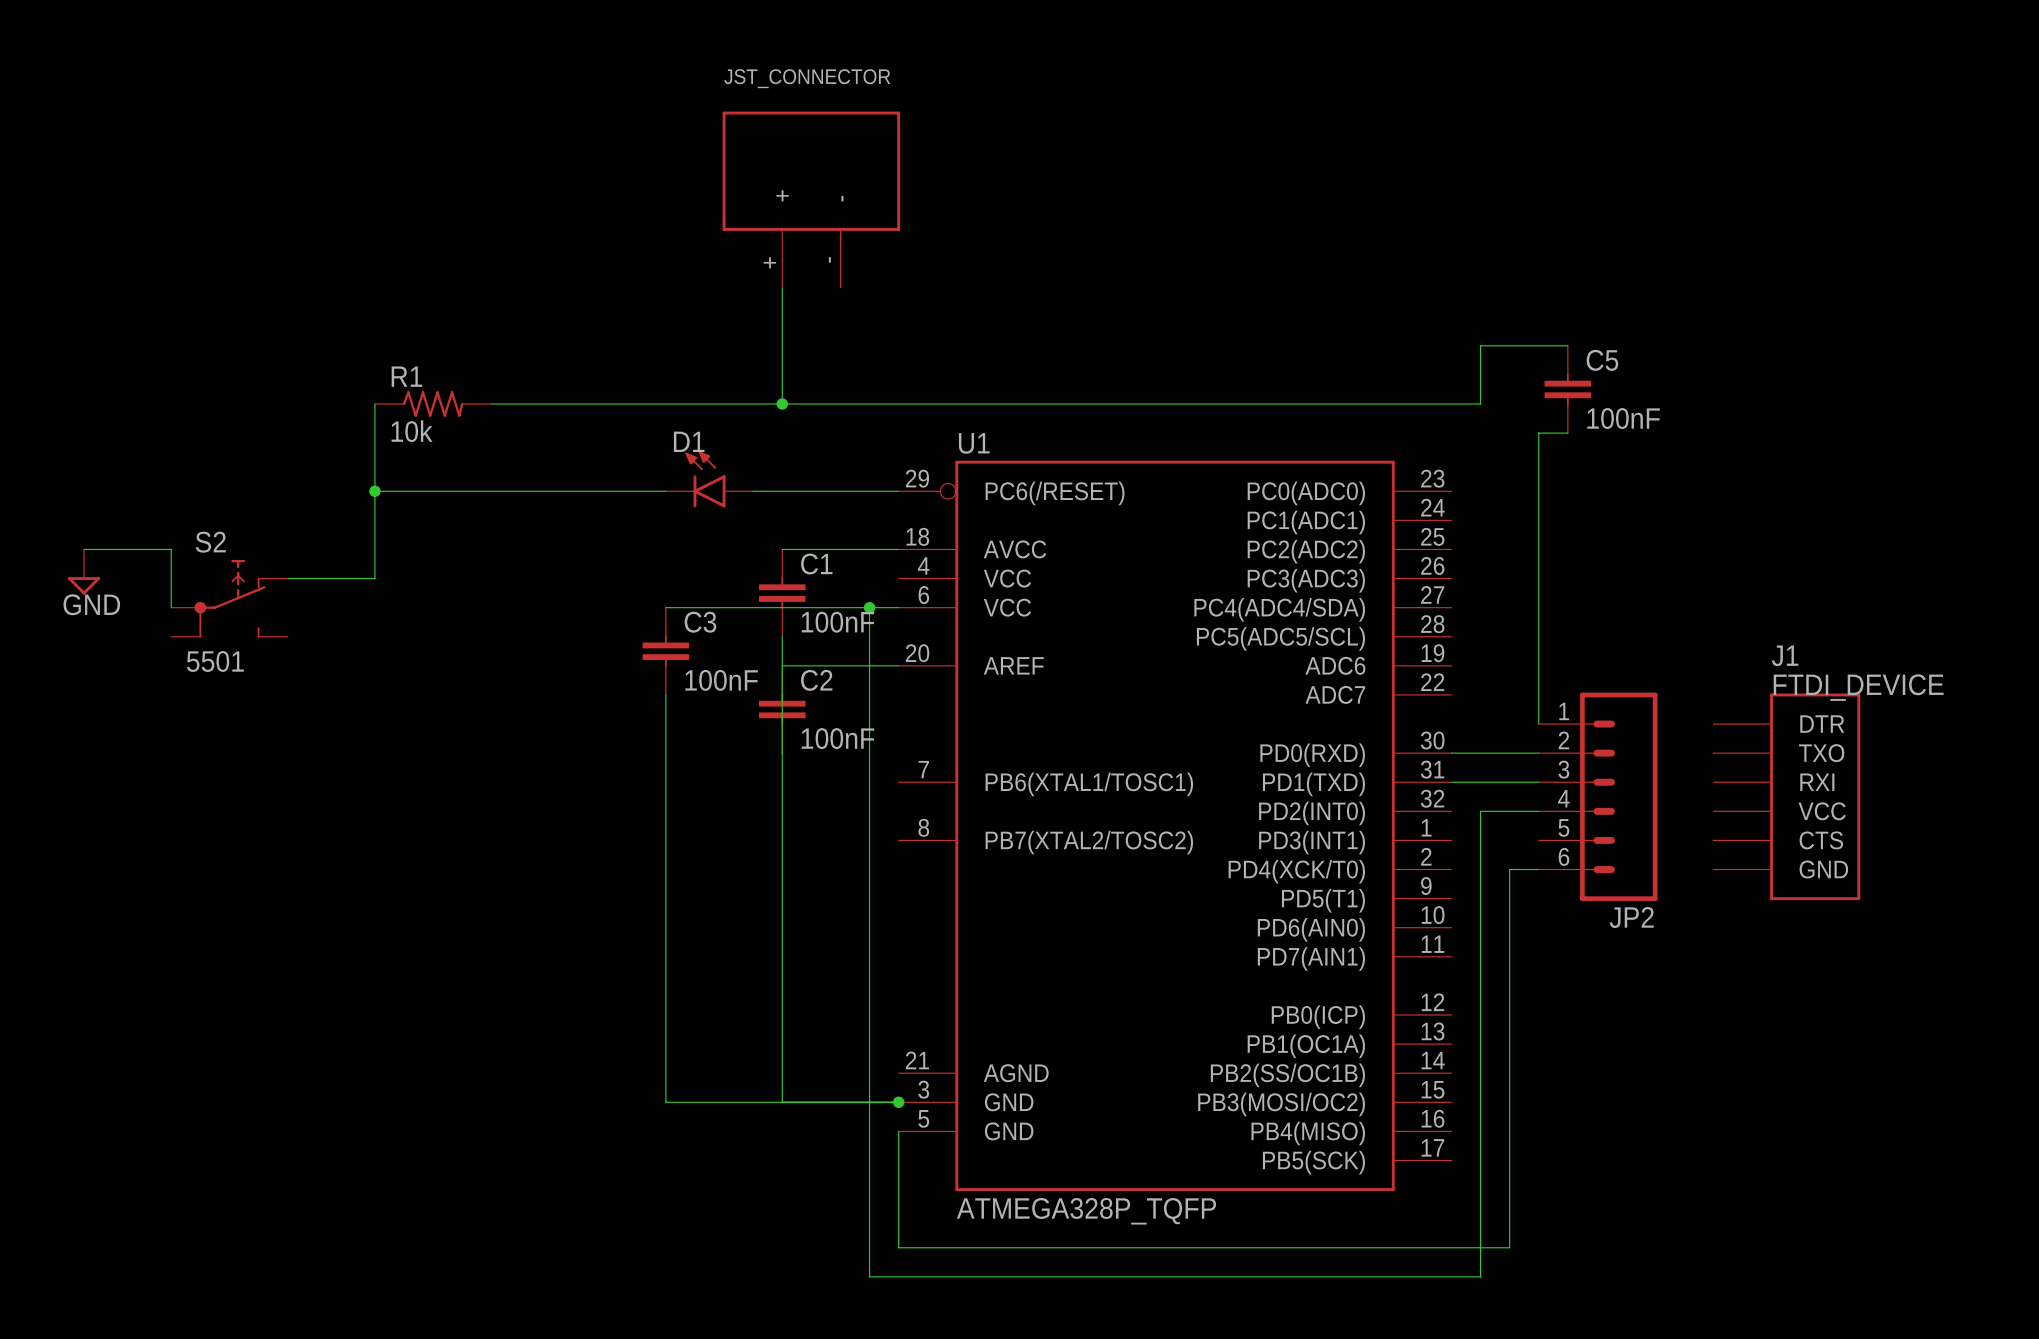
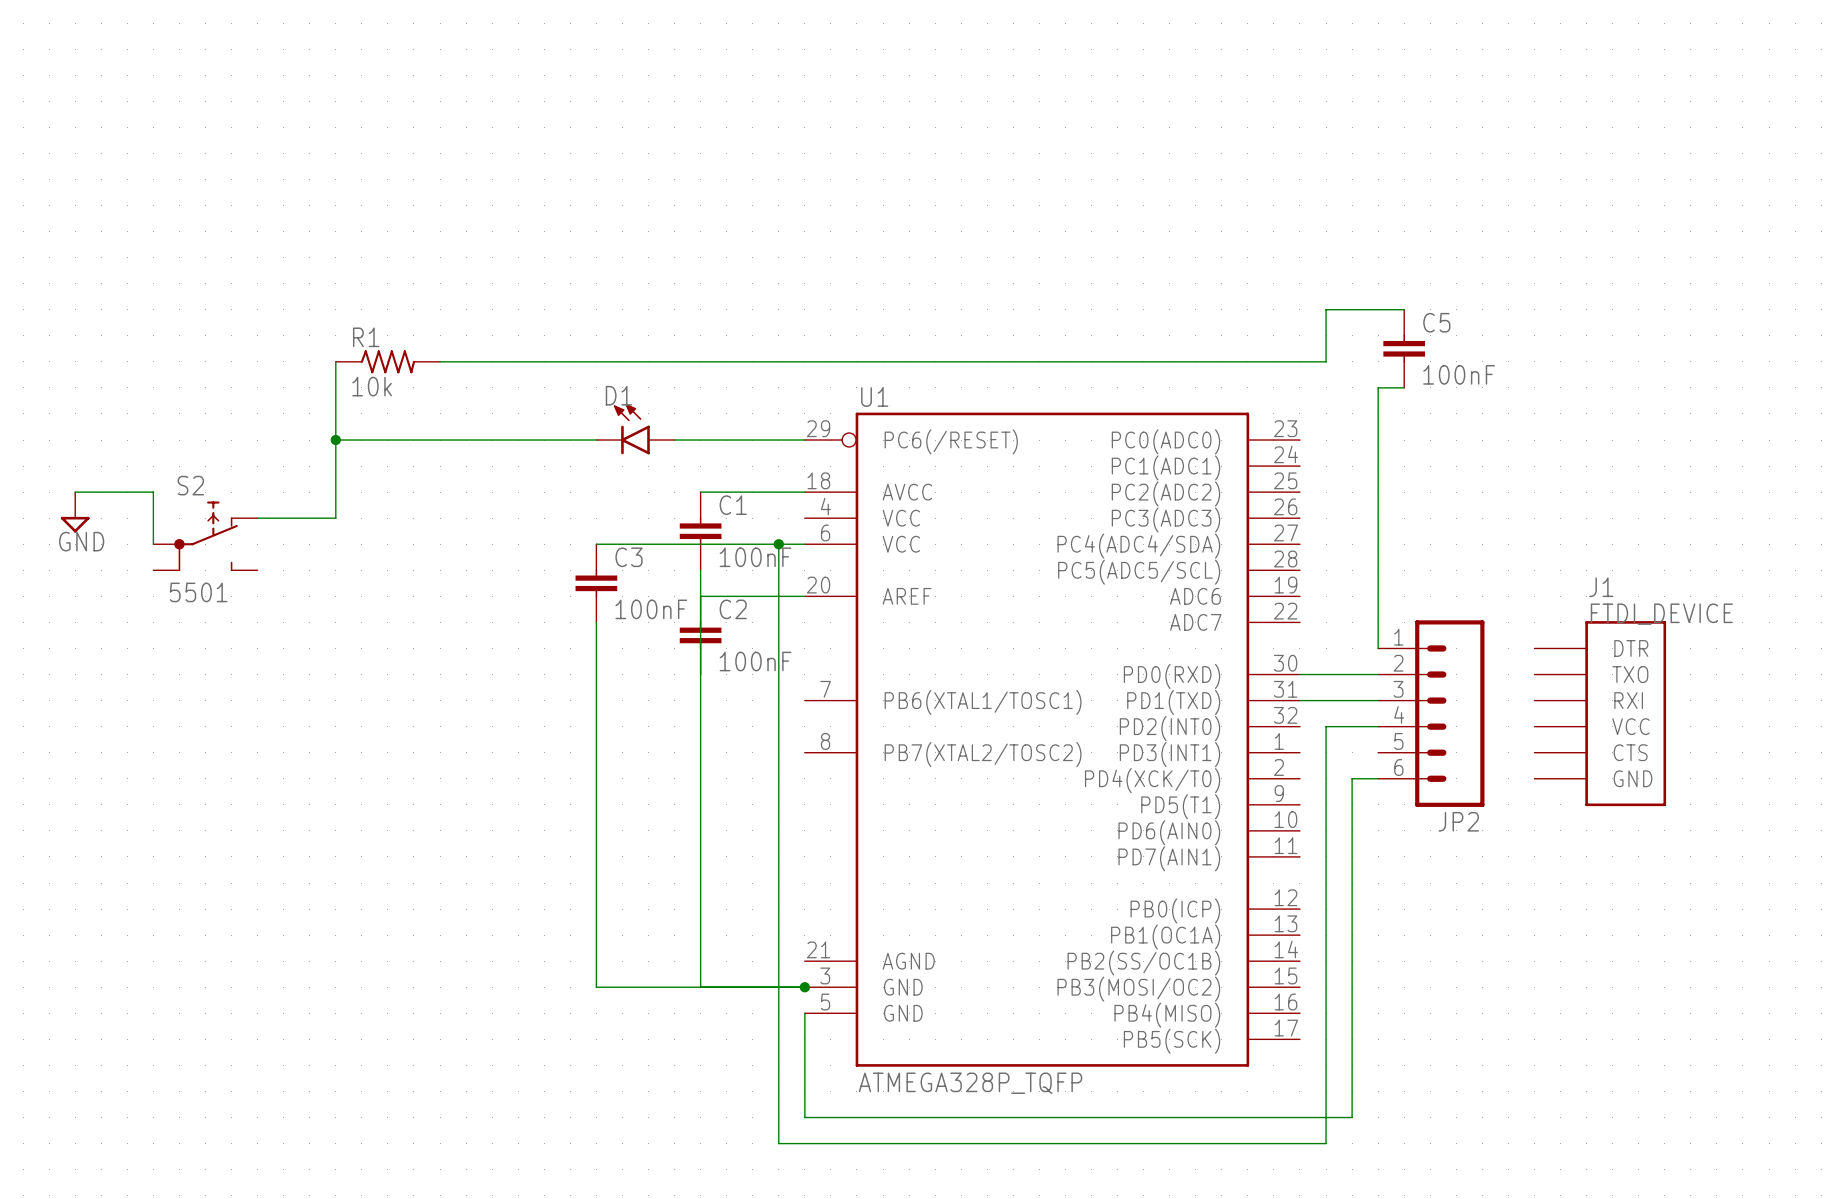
part: (811, 199) -> none
wire: (782, 287) (782, 403) -> none
junction: (782, 403) -> none

